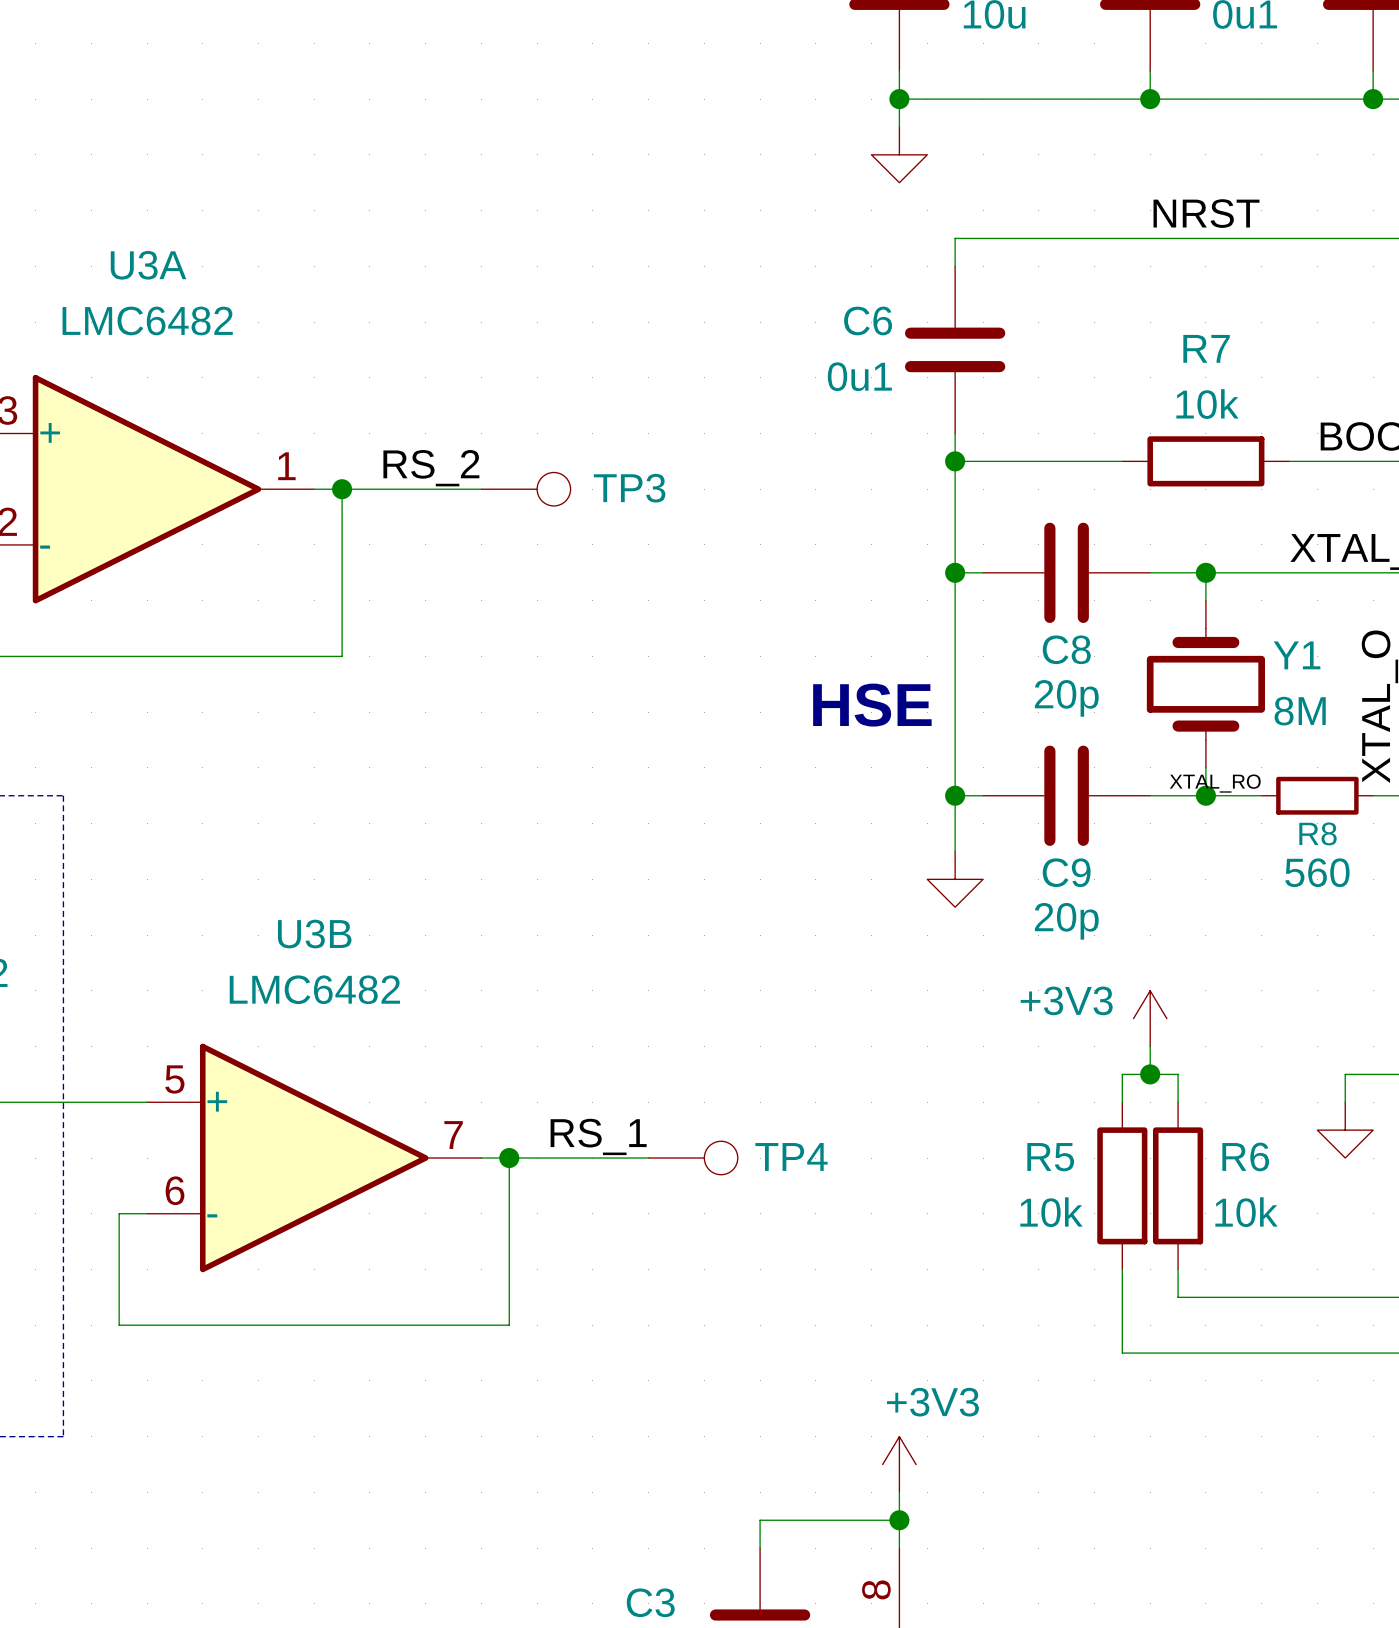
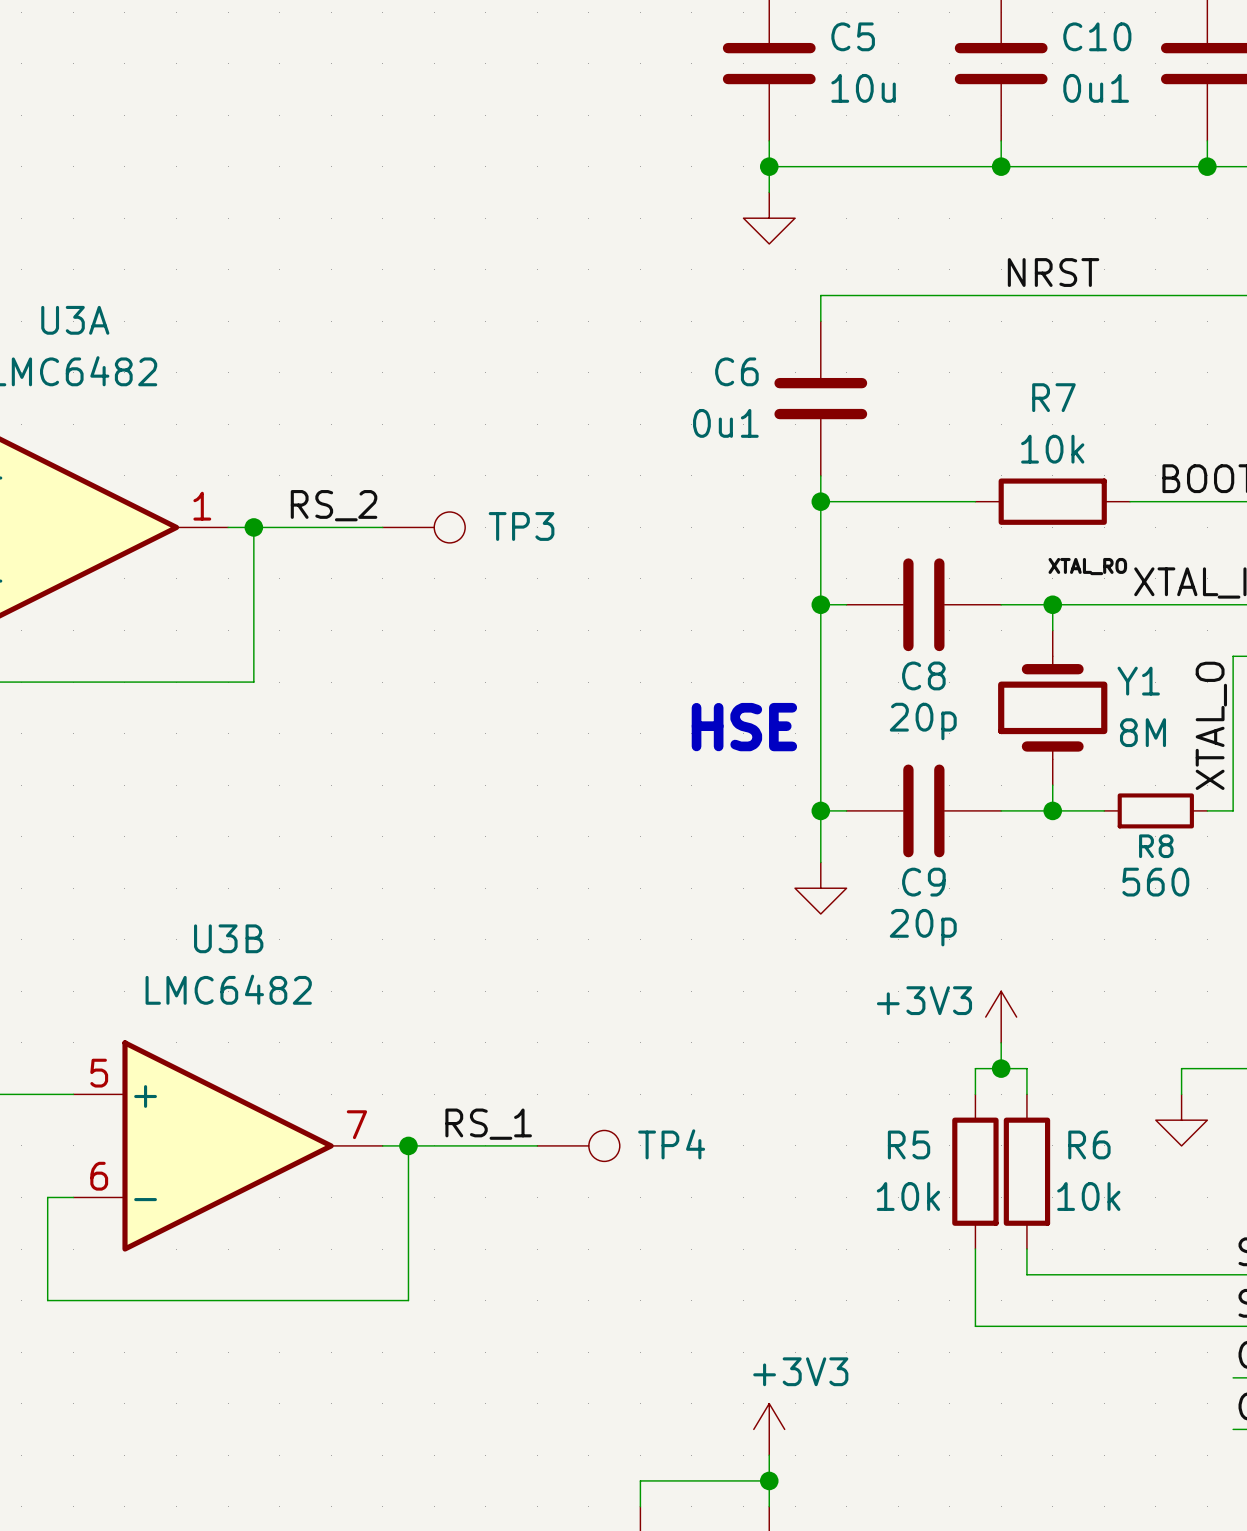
label position: XTAL_RO (1215, 783) -> XTAL_RO (1087, 566)

